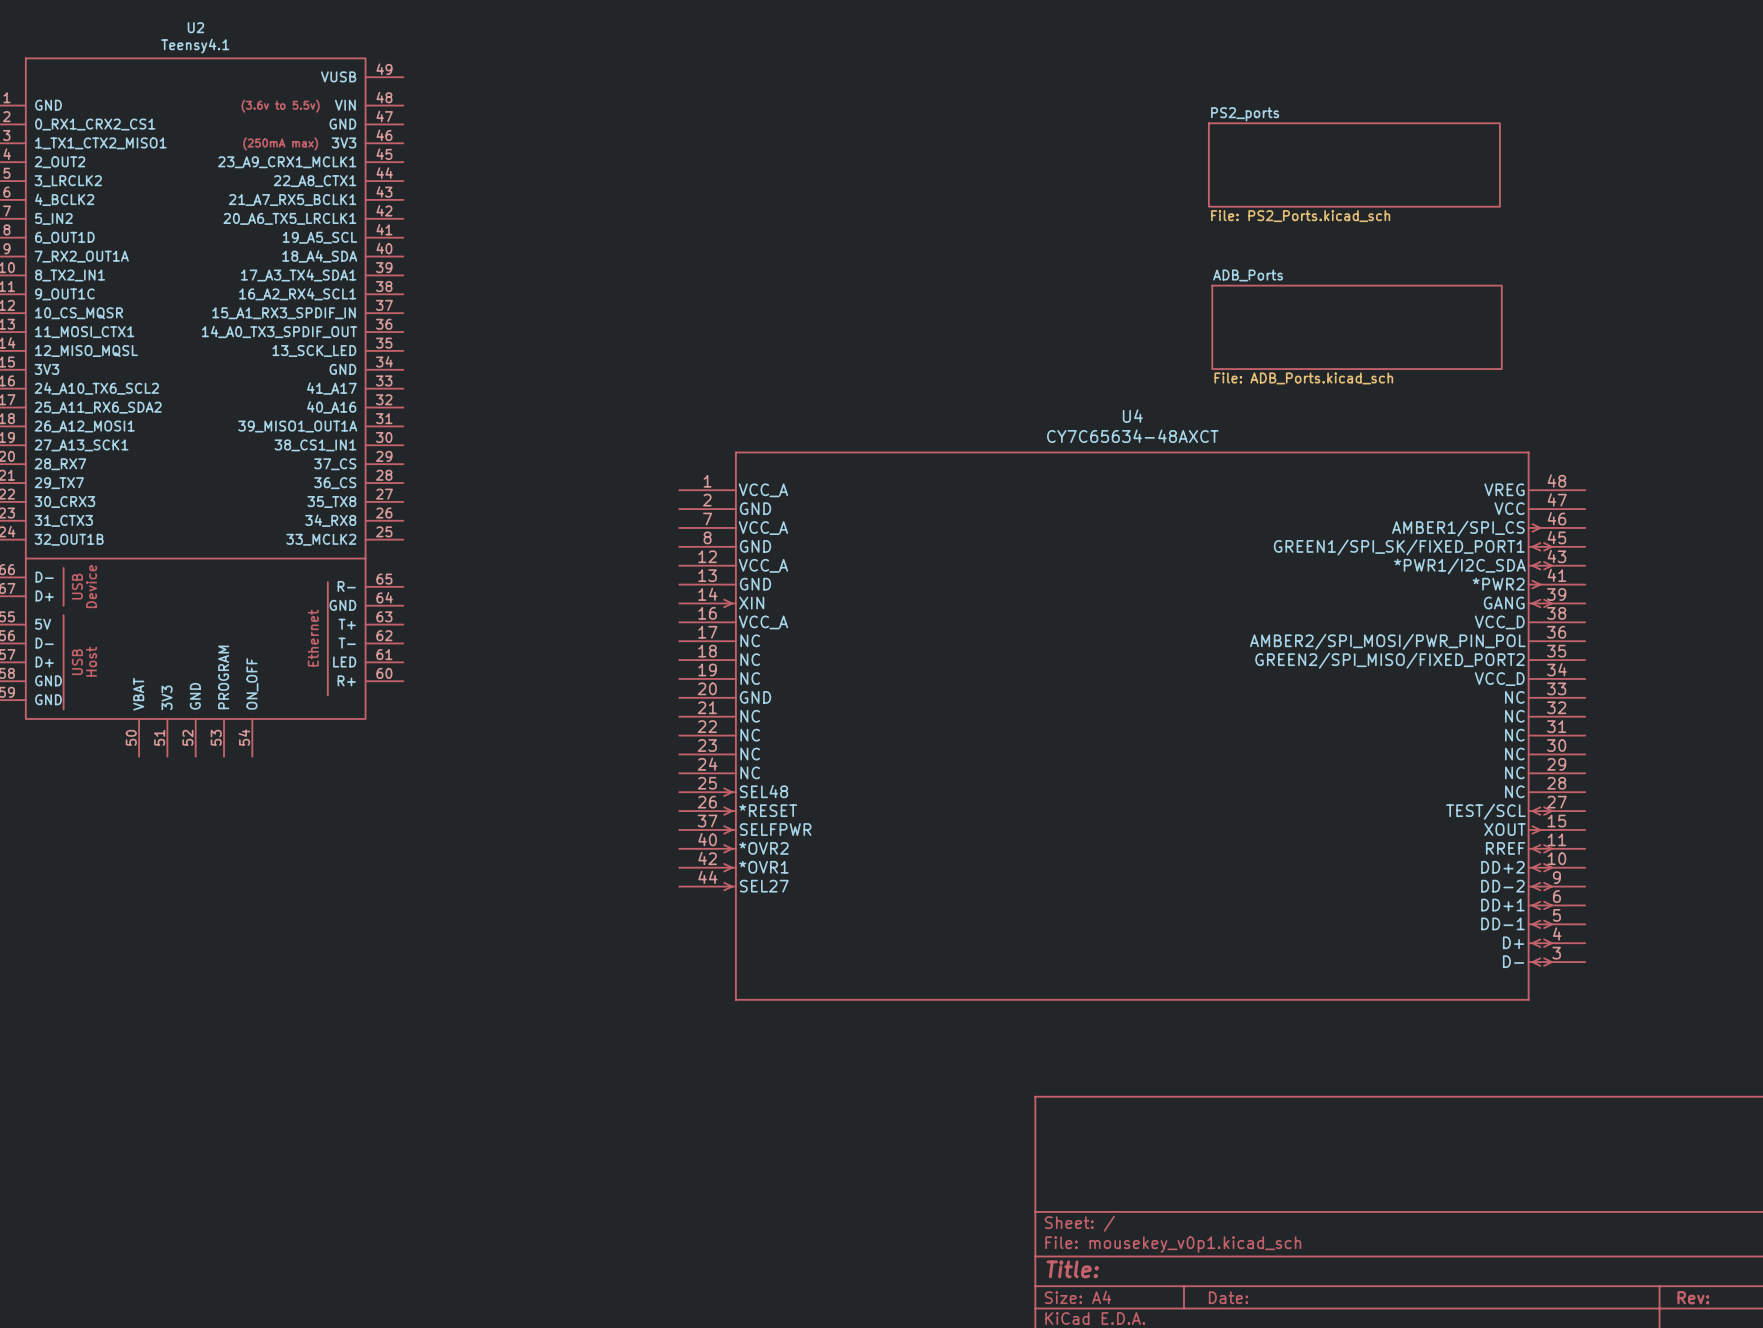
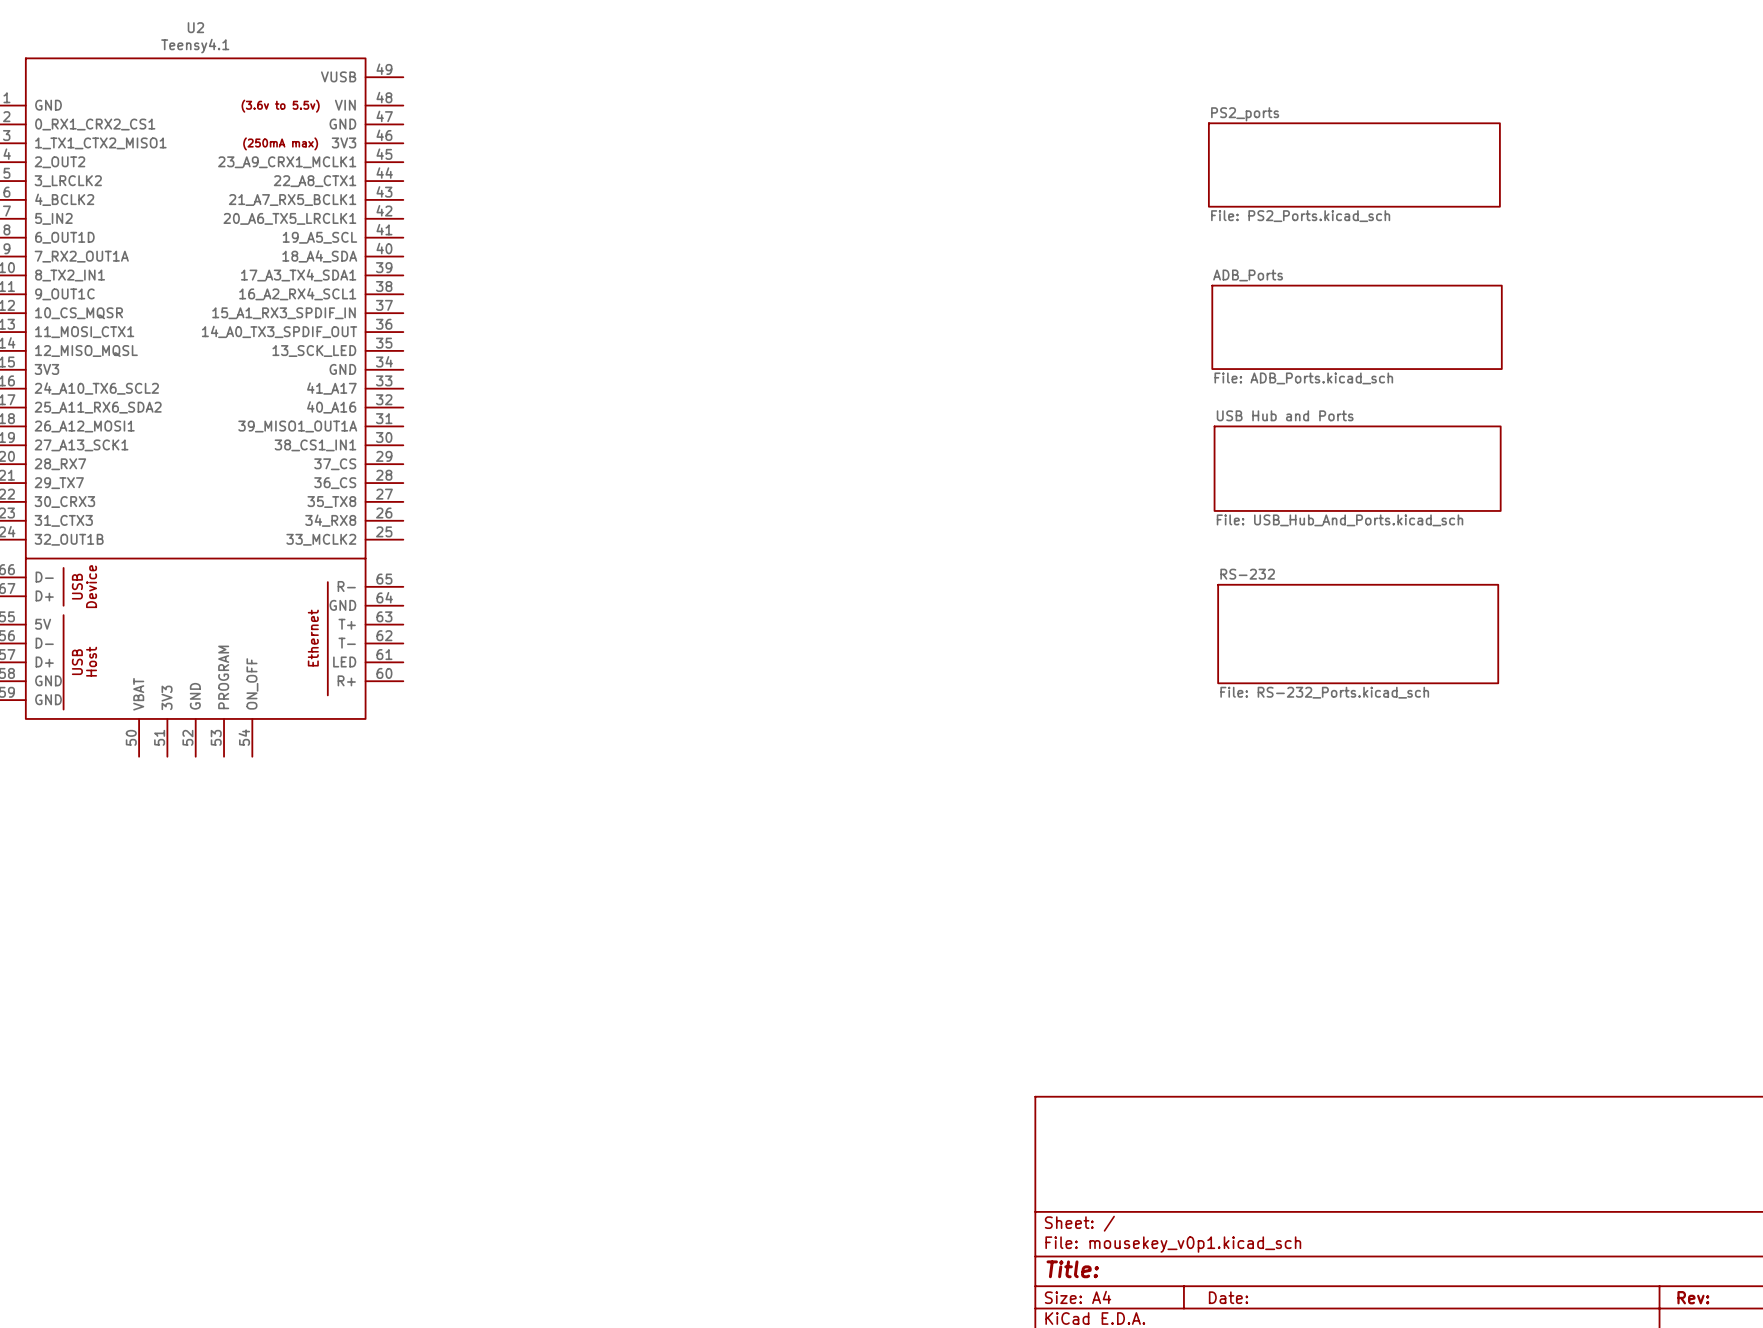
sheet USB Hub and Ports: none -> File: USB_Hub_And_Ports.kicad_sch (1357, 468)
sheet RS-232: none -> File: RS-232_Ports.kicad_sch (1358, 634)
U4: CY7C65634-48AXCT (1132, 726) -> none

